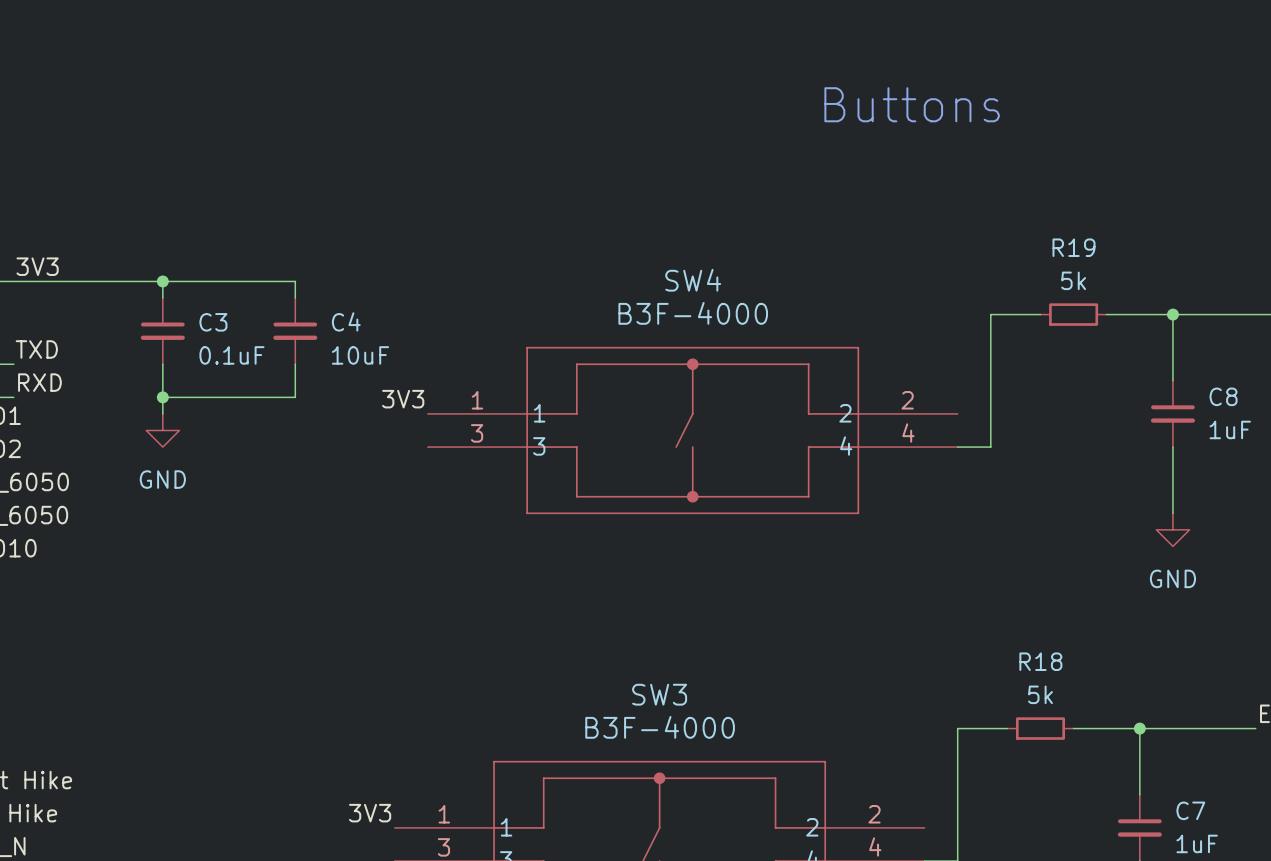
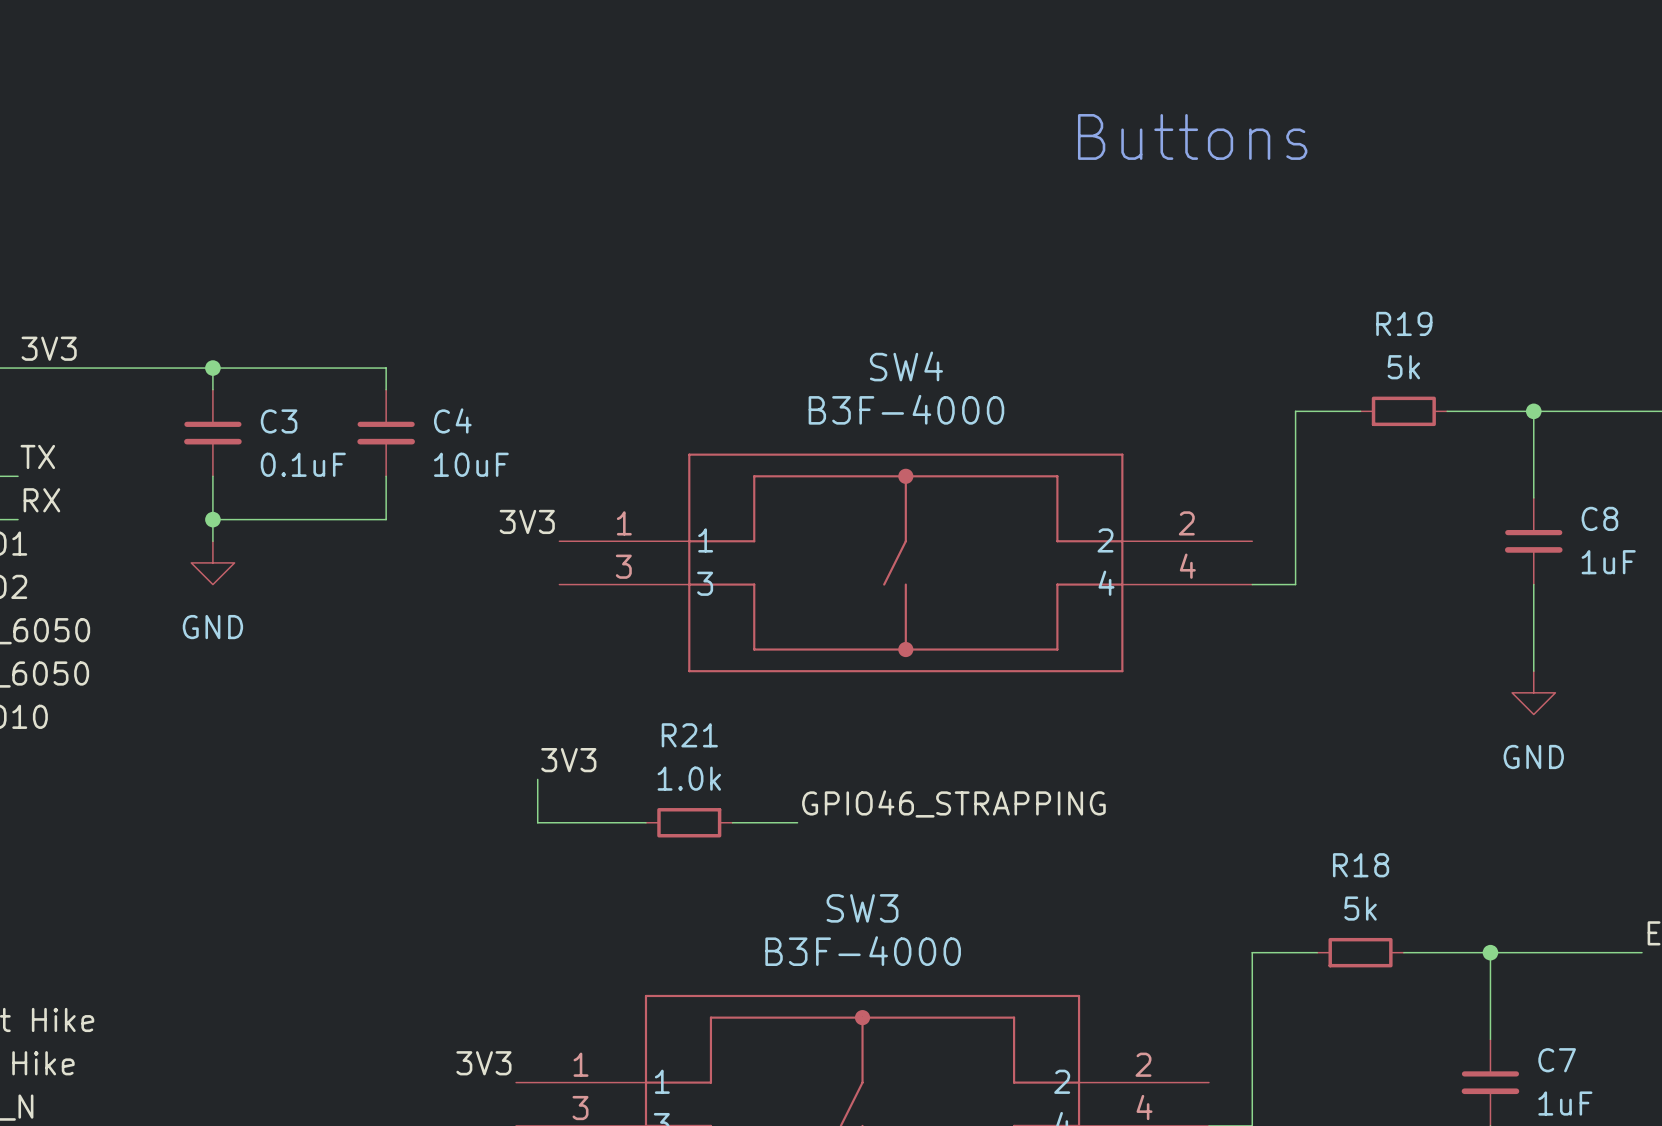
label: TXD (36, 349) -> TX (37, 456)
label: RXD (39, 382) -> RX (41, 500)
label: none -> 3V3 (568, 760)
wire: none -> (537, 779) (537, 822) (645, 822)
label: none -> GPIO46_STRAPPING (953, 803)
R21: none -> 1.0k (689, 822)
wire: none -> (732, 822) (797, 822)

